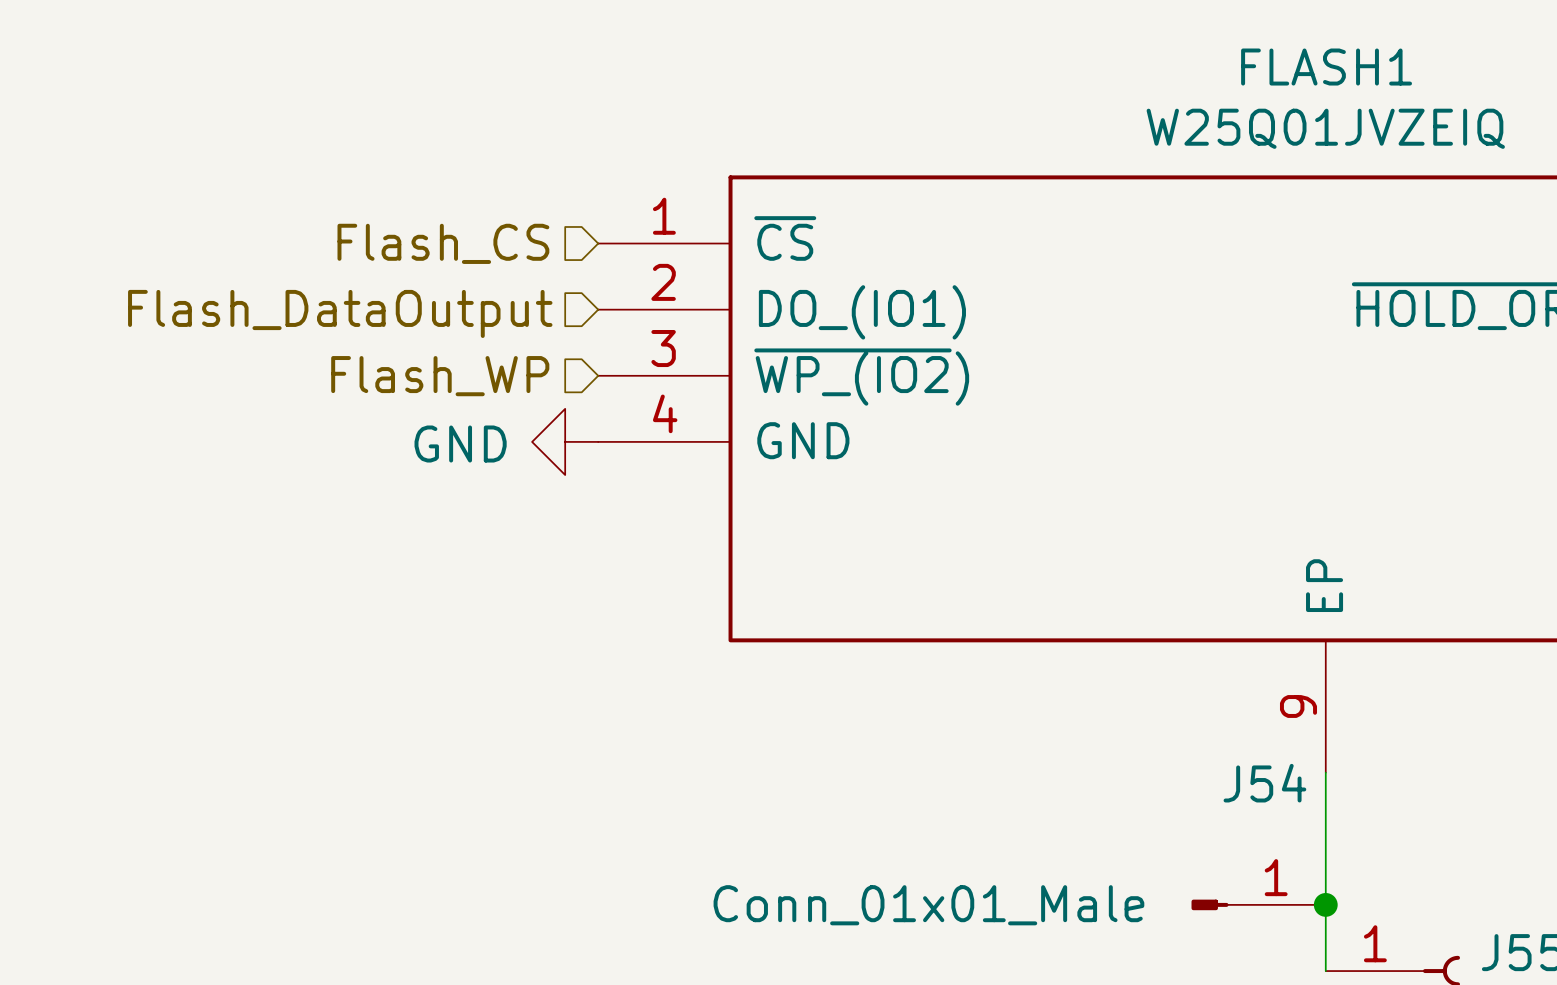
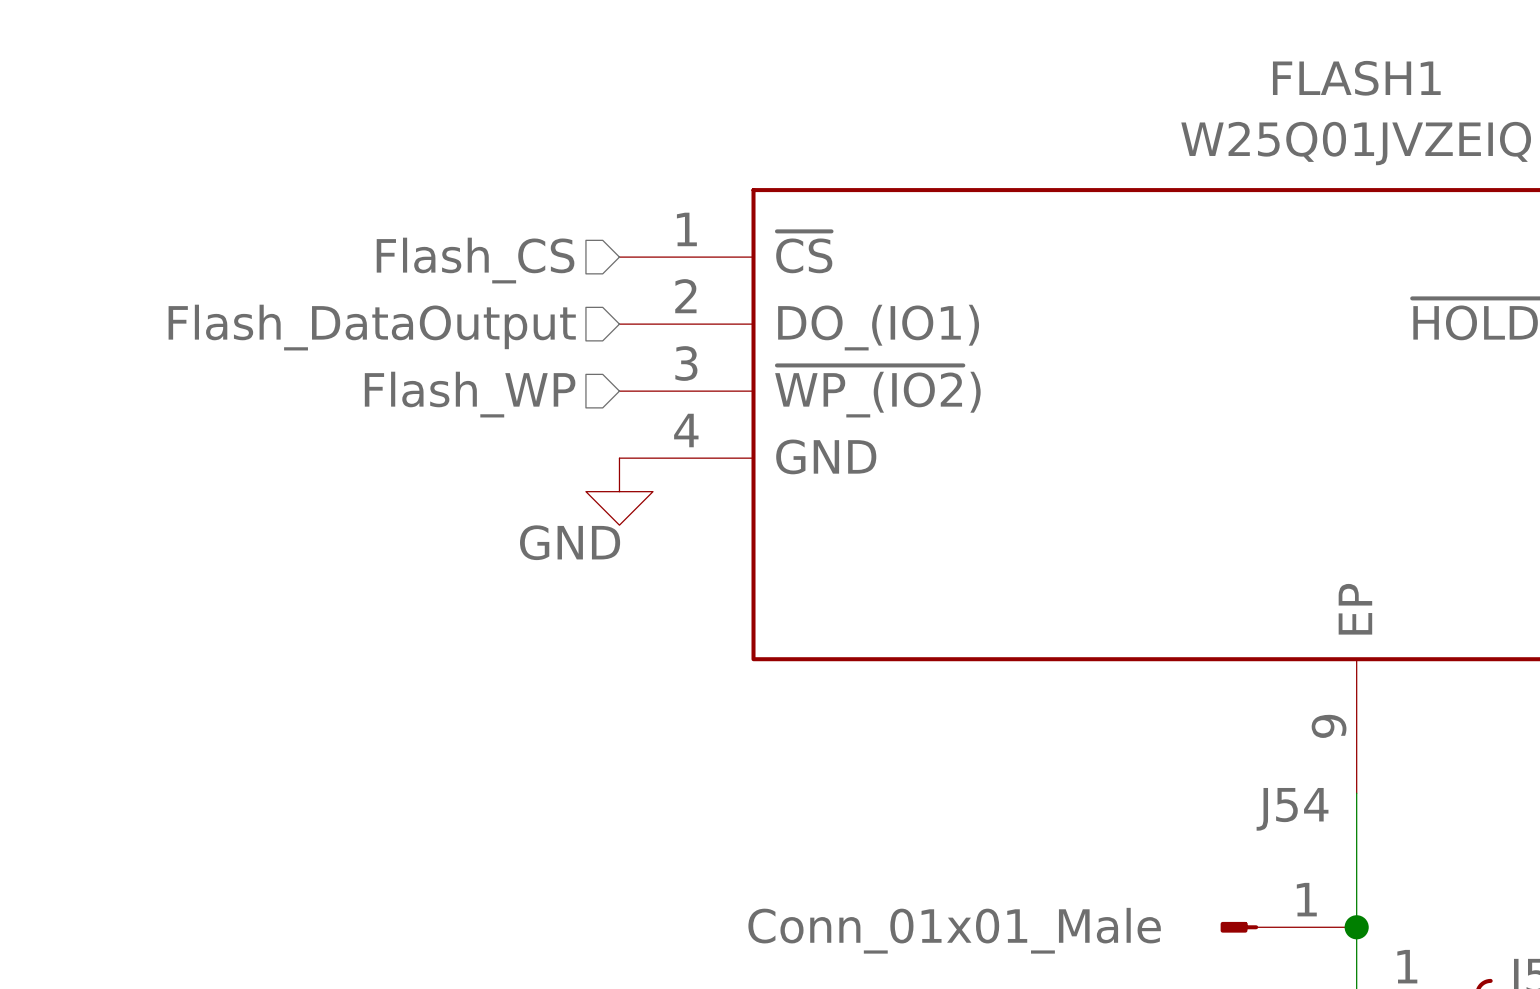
power symbol rotation: 0° (565, 441) -> 90° counterclockwise (619, 491)
power symbol position: GND (565, 441) -> GND (619, 491)
power symbol text position: GND (460, 444) -> GND (570, 542)

